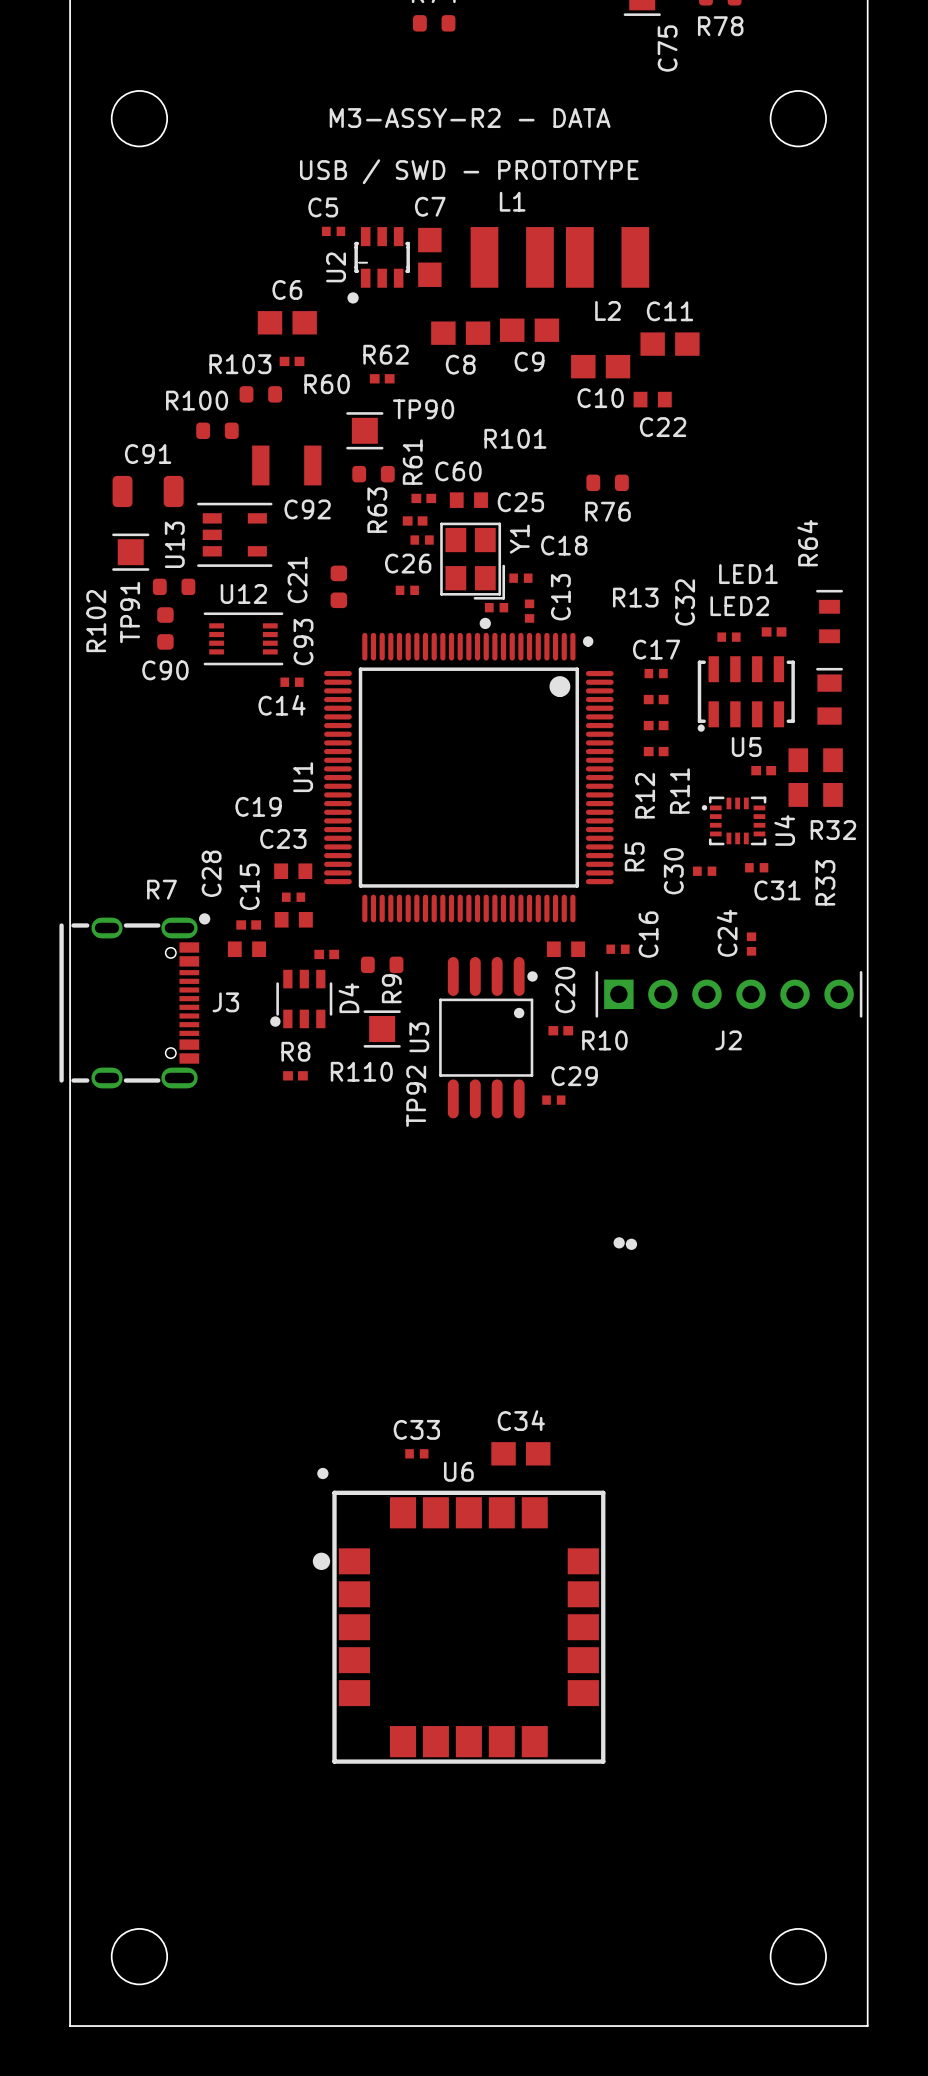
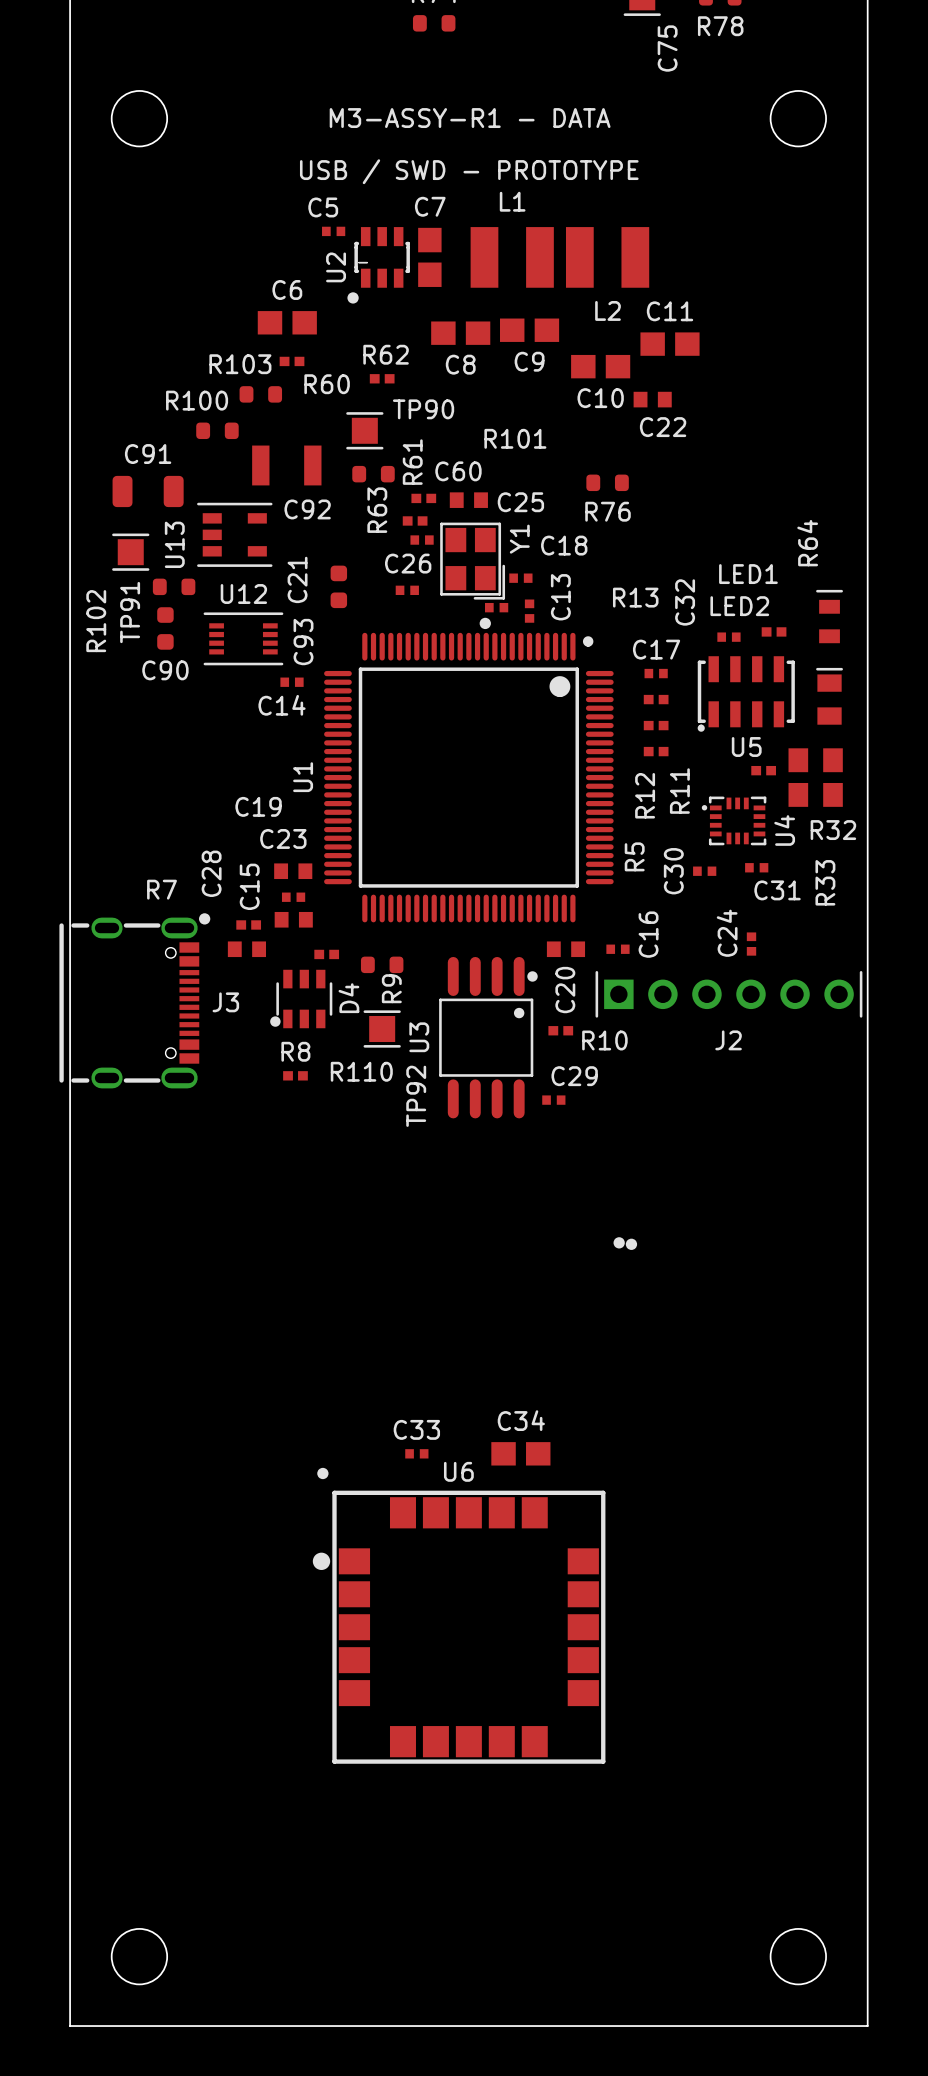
text: M3-ASSY-R2 - DATA (470, 118) -> M3-ASSY-R1 - DATA (470, 118)

